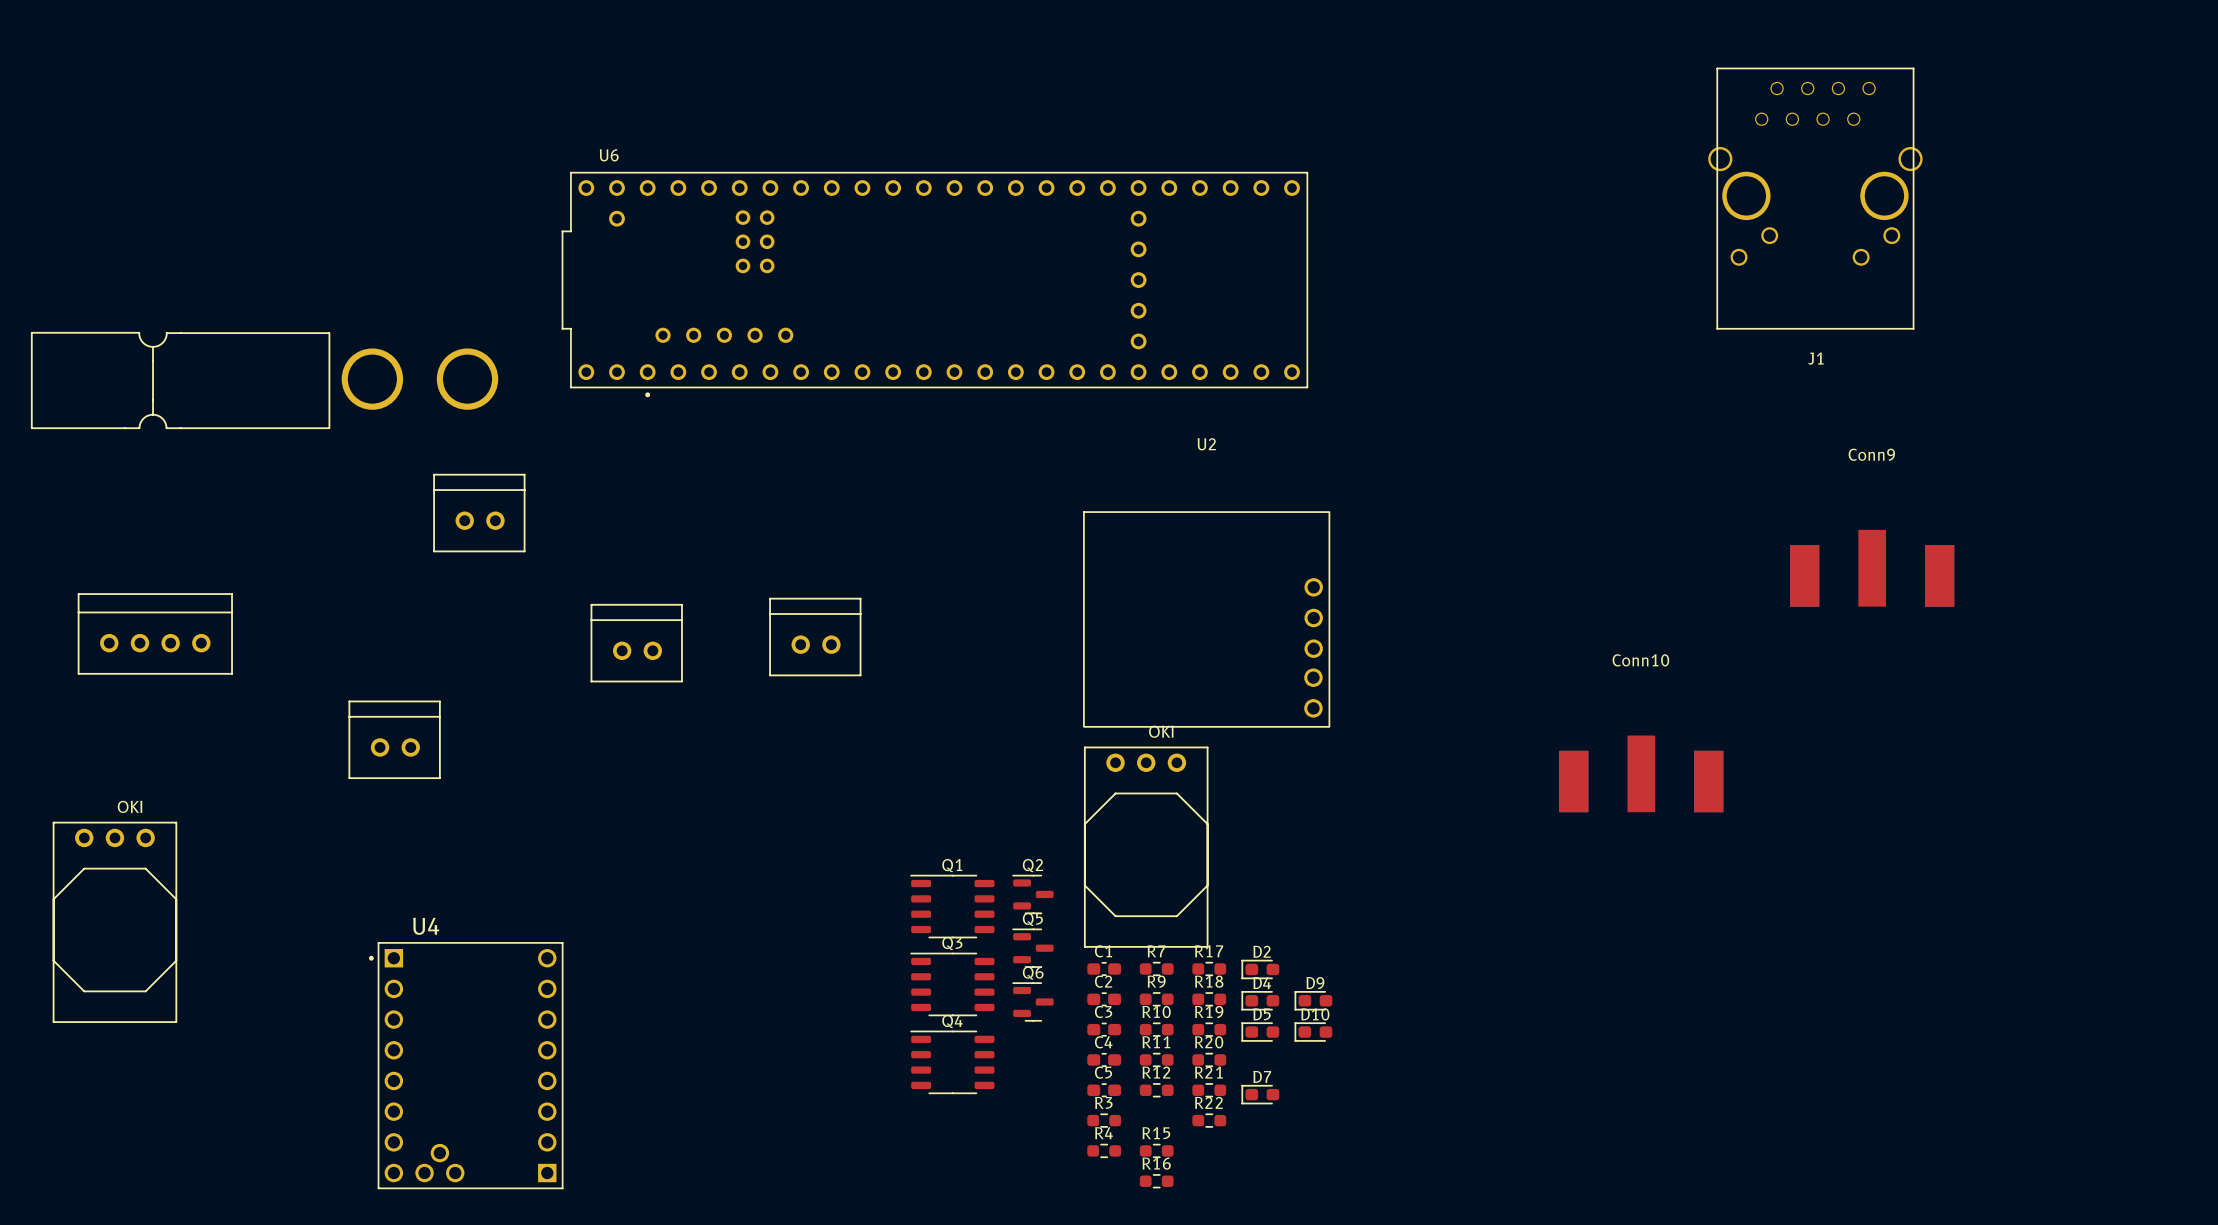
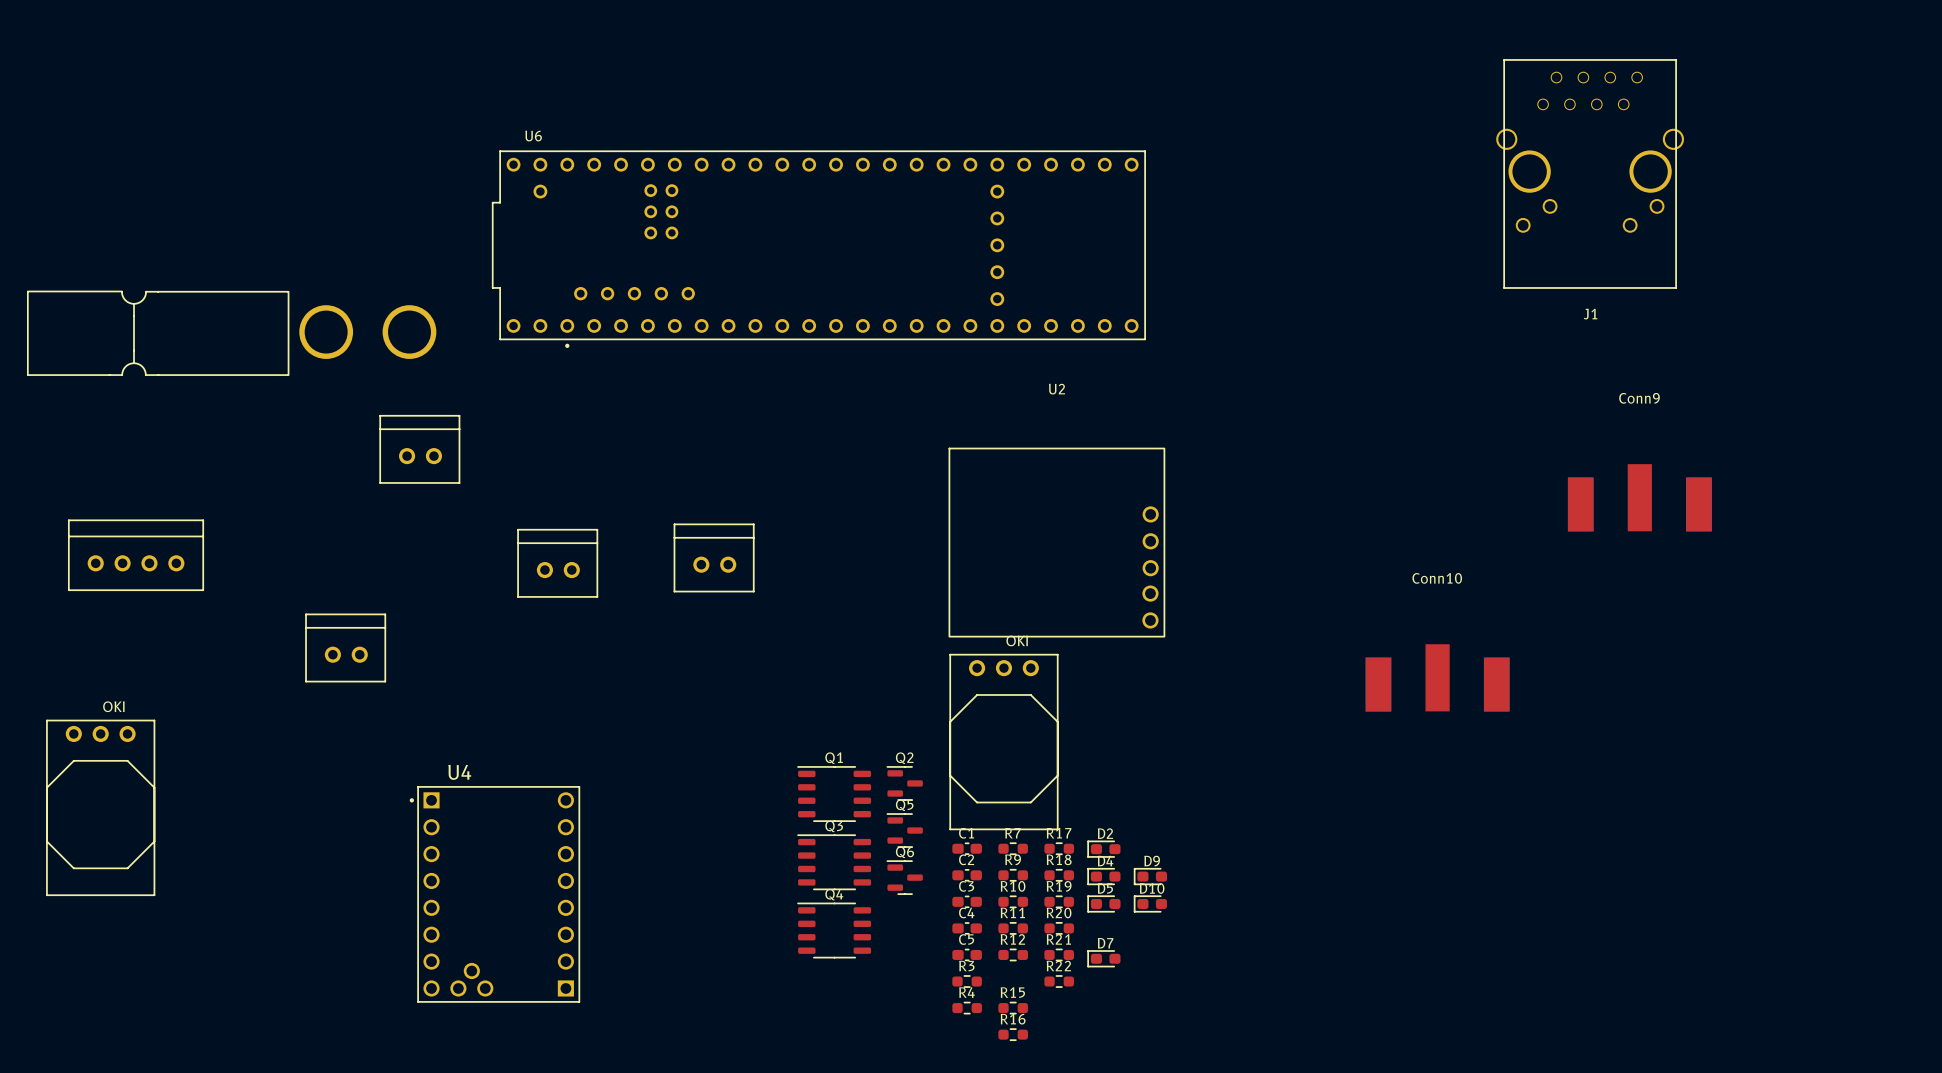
U4 position: (466, 1065) -> (494, 894)

